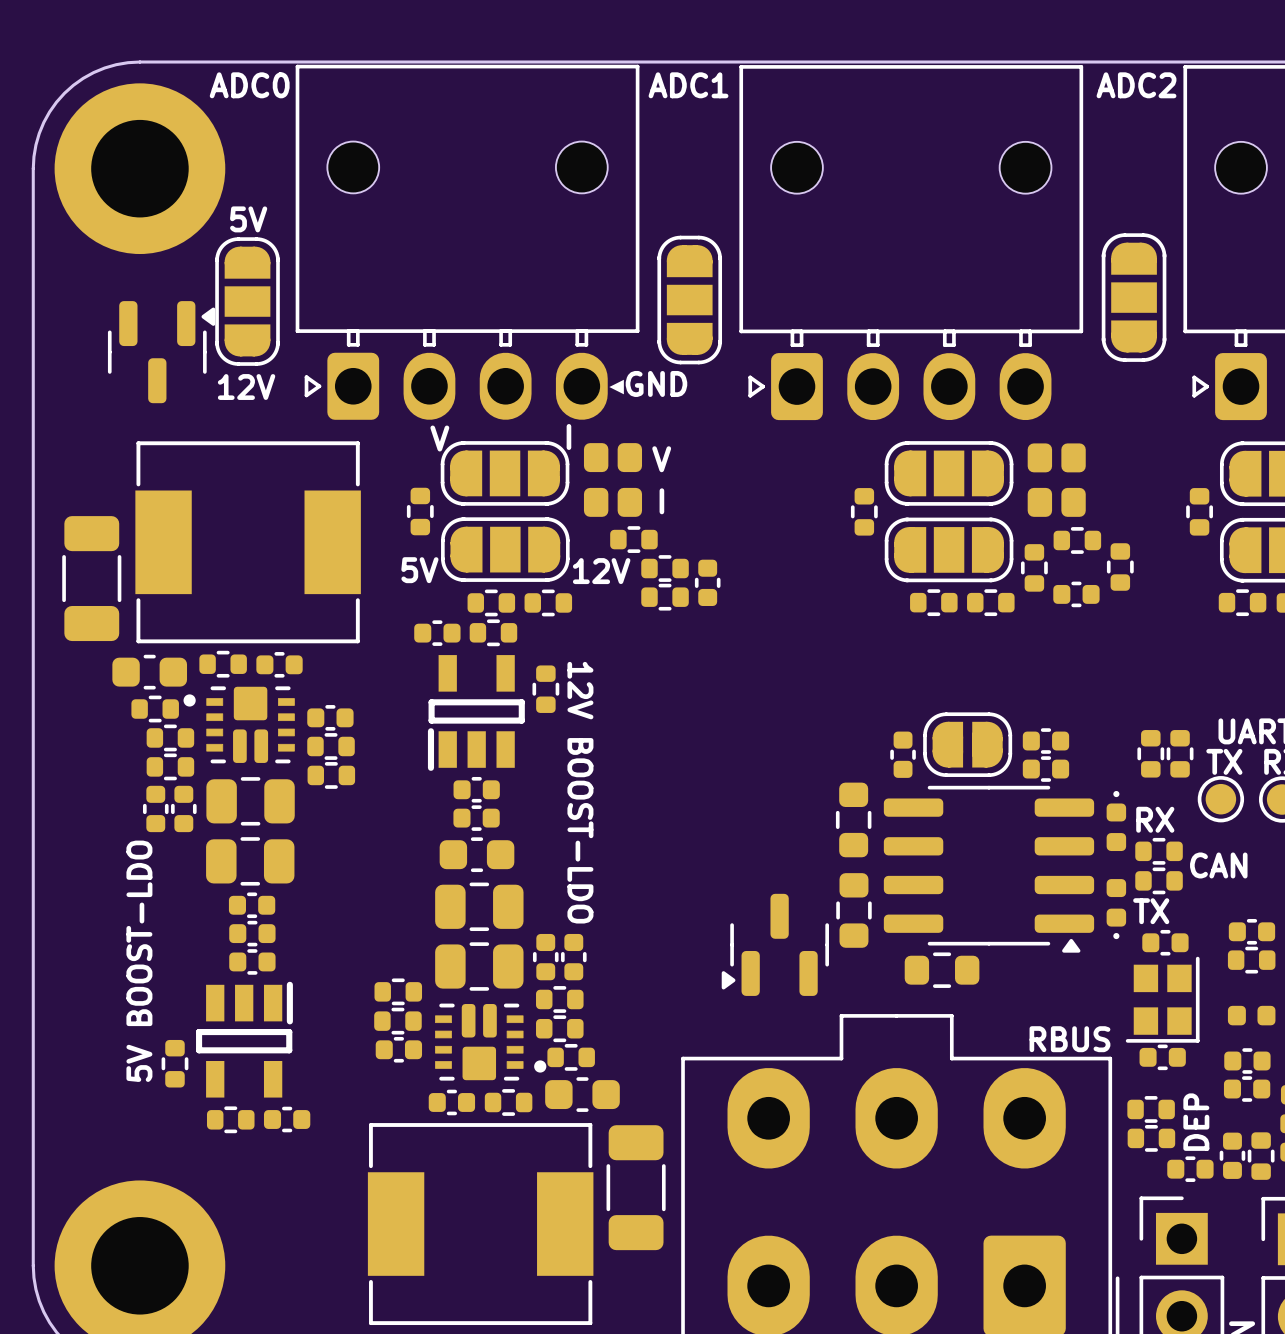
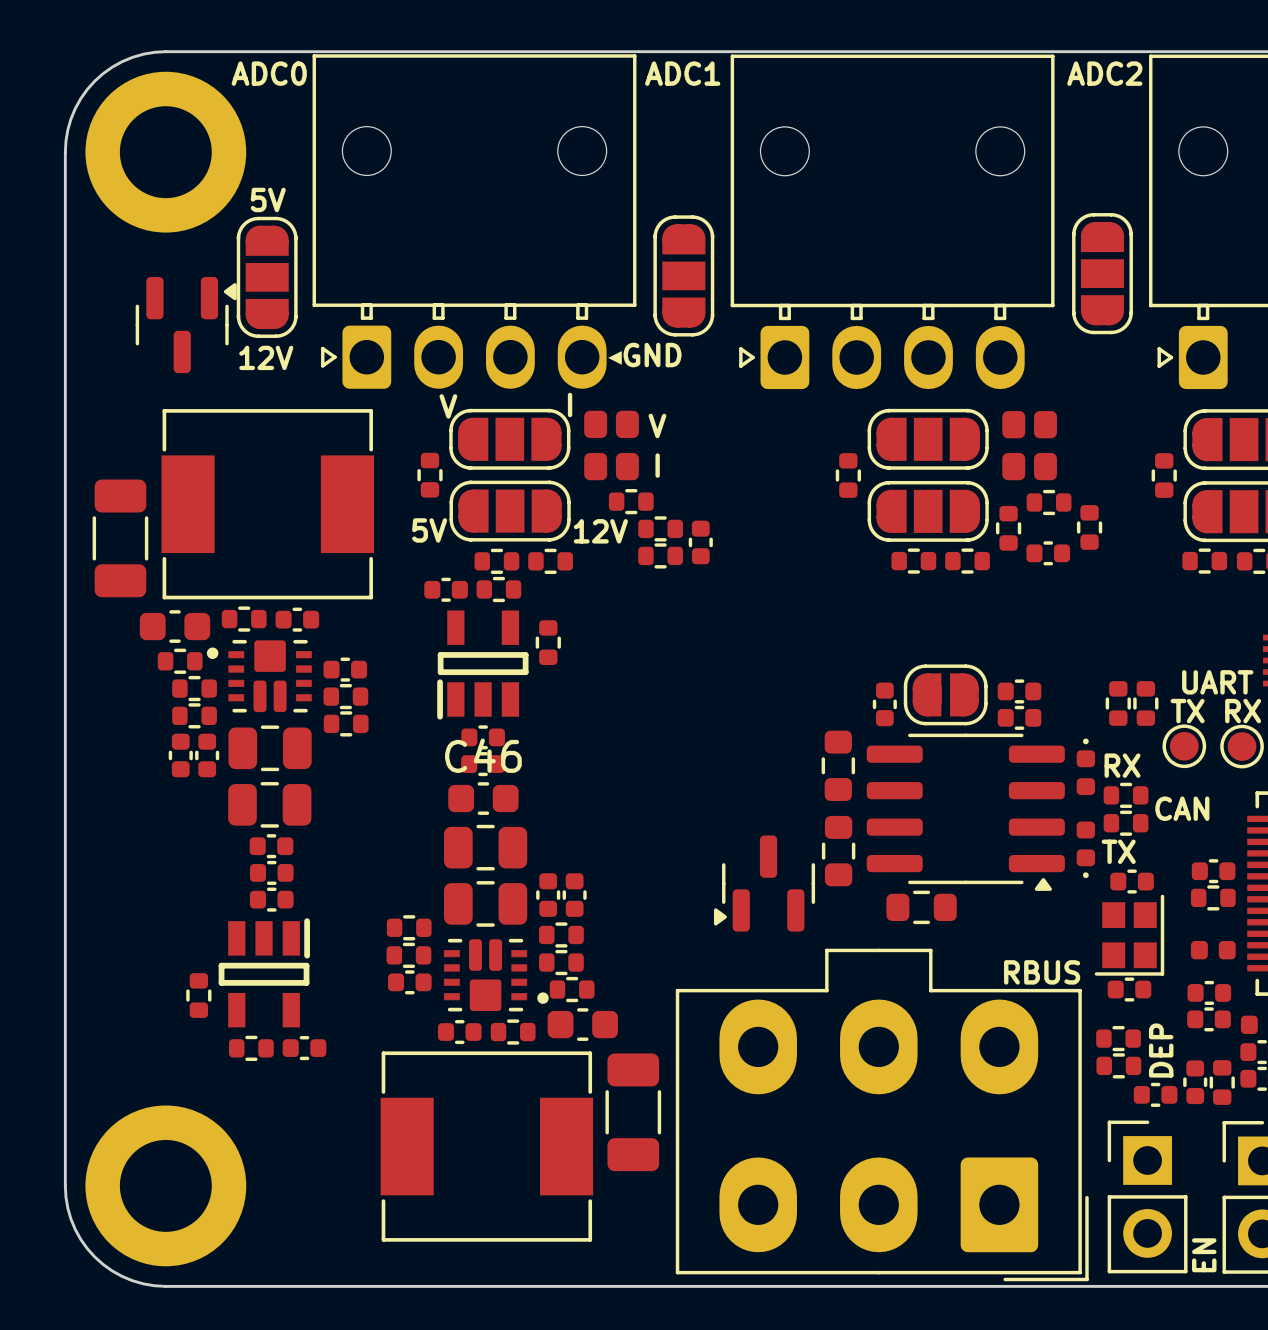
text: 12V BOOST-LDO (580, 792) -> none
C46 name: none -> C46 (483, 755)
text: 5V BOOST-LDO (139, 961) -> none

